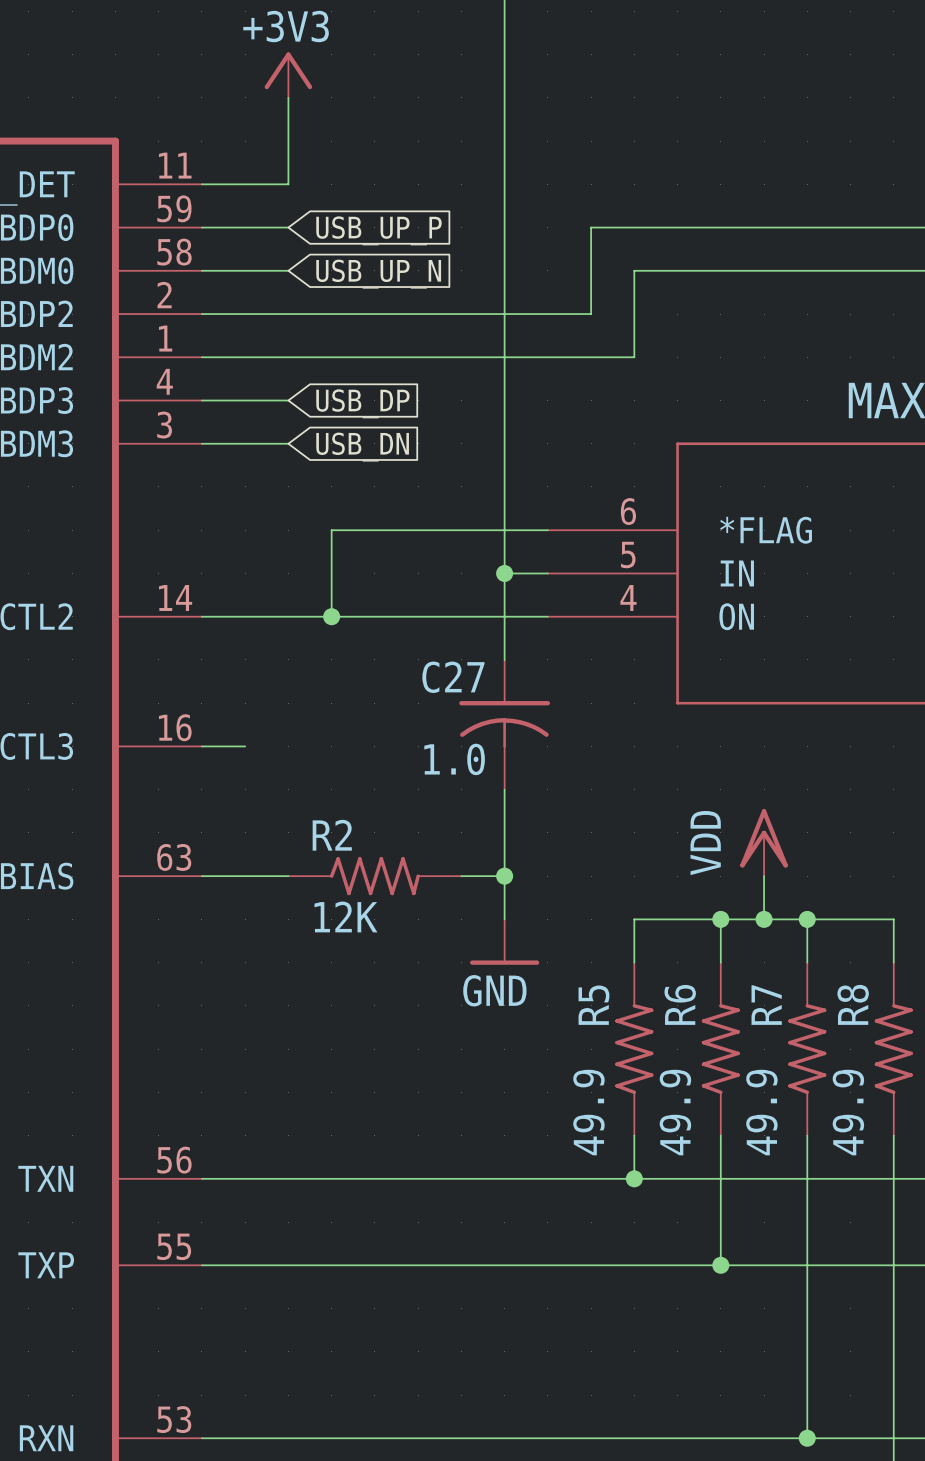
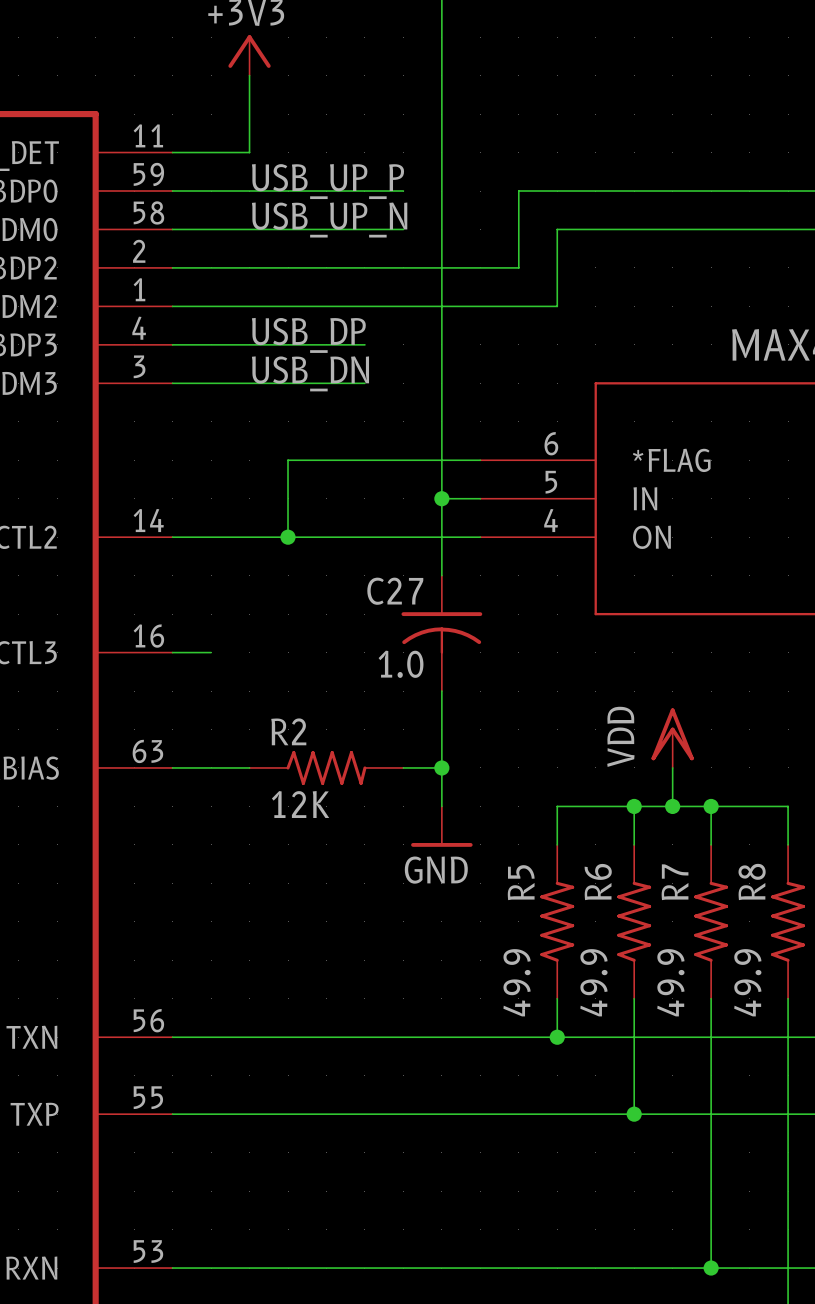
label: none -> USB_UP_P (327, 181)
wire: none -> (249, 191) (403, 191)
global label: USB_UP_P (378, 230) -> none
label: none -> USB_UP_N (329, 220)
wire: none -> (249, 229) (403, 229)
global label: USB_UP_N (378, 274) -> none
label: none -> USB_DP (308, 335)
wire: none -> (249, 344) (364, 344)
global label: USB_DP (362, 403) -> none
label: none -> USB_DN (310, 373)
wire: none -> (249, 383) (364, 383)
global label: USB_DN (362, 447) -> none

